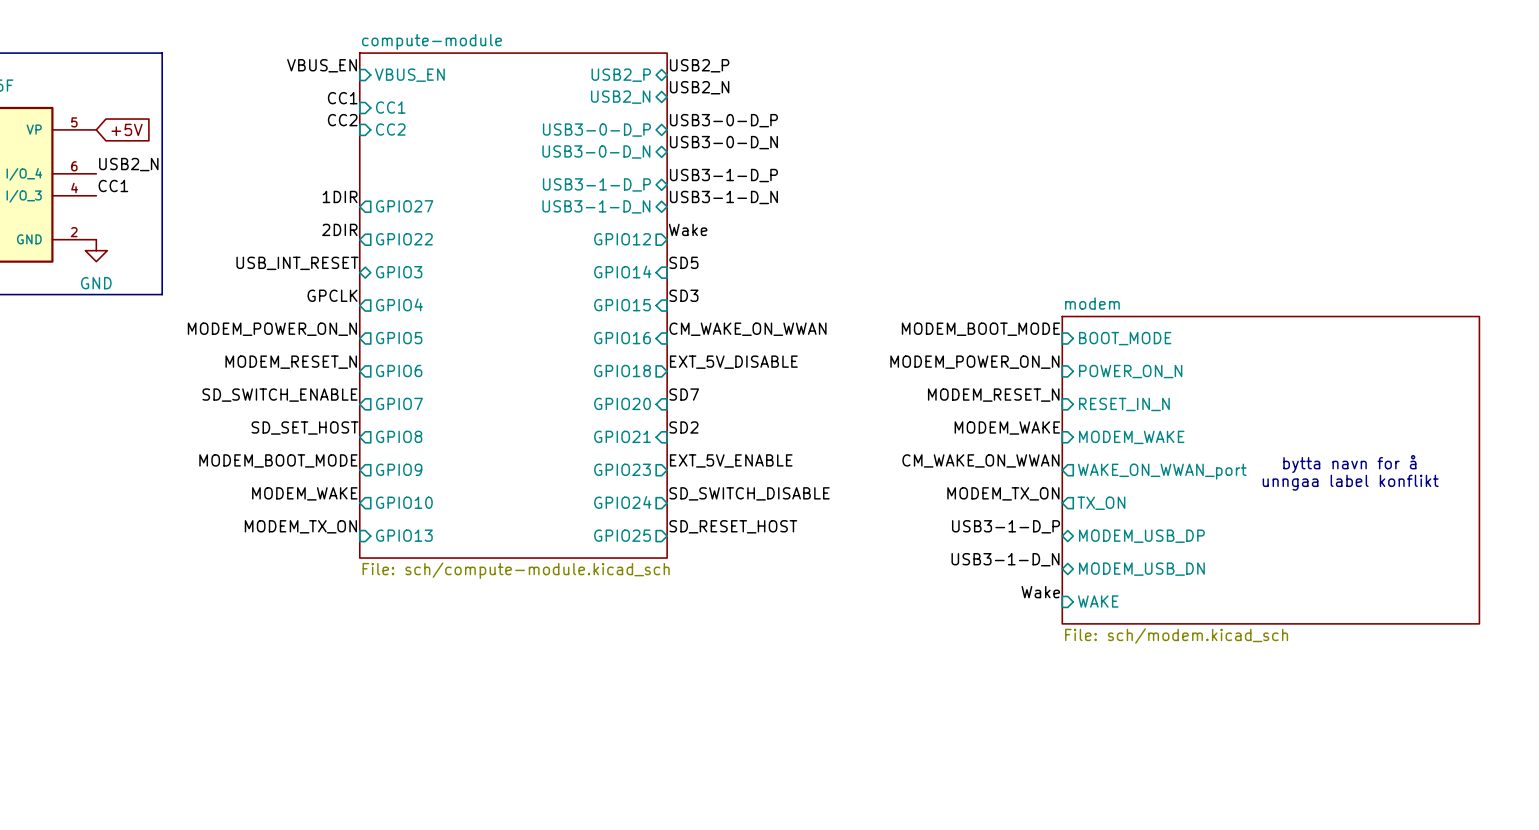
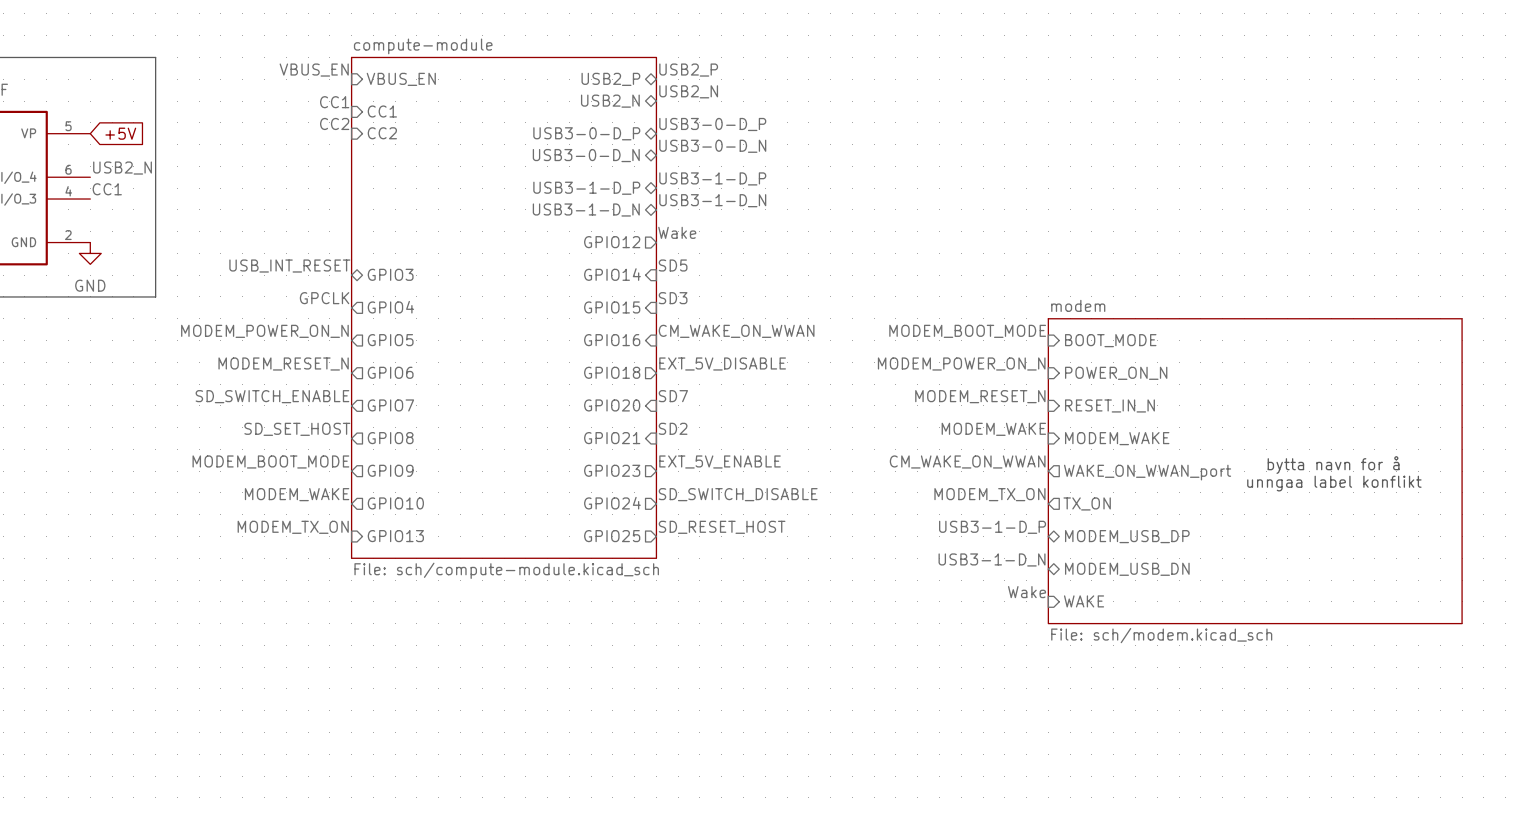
label: 1DIR (340, 196) -> none
sheet pin: GPIO27 (404, 206) -> none
label: 2DIR (339, 229) -> none
sheet pin: GPIO22 (404, 239) -> none

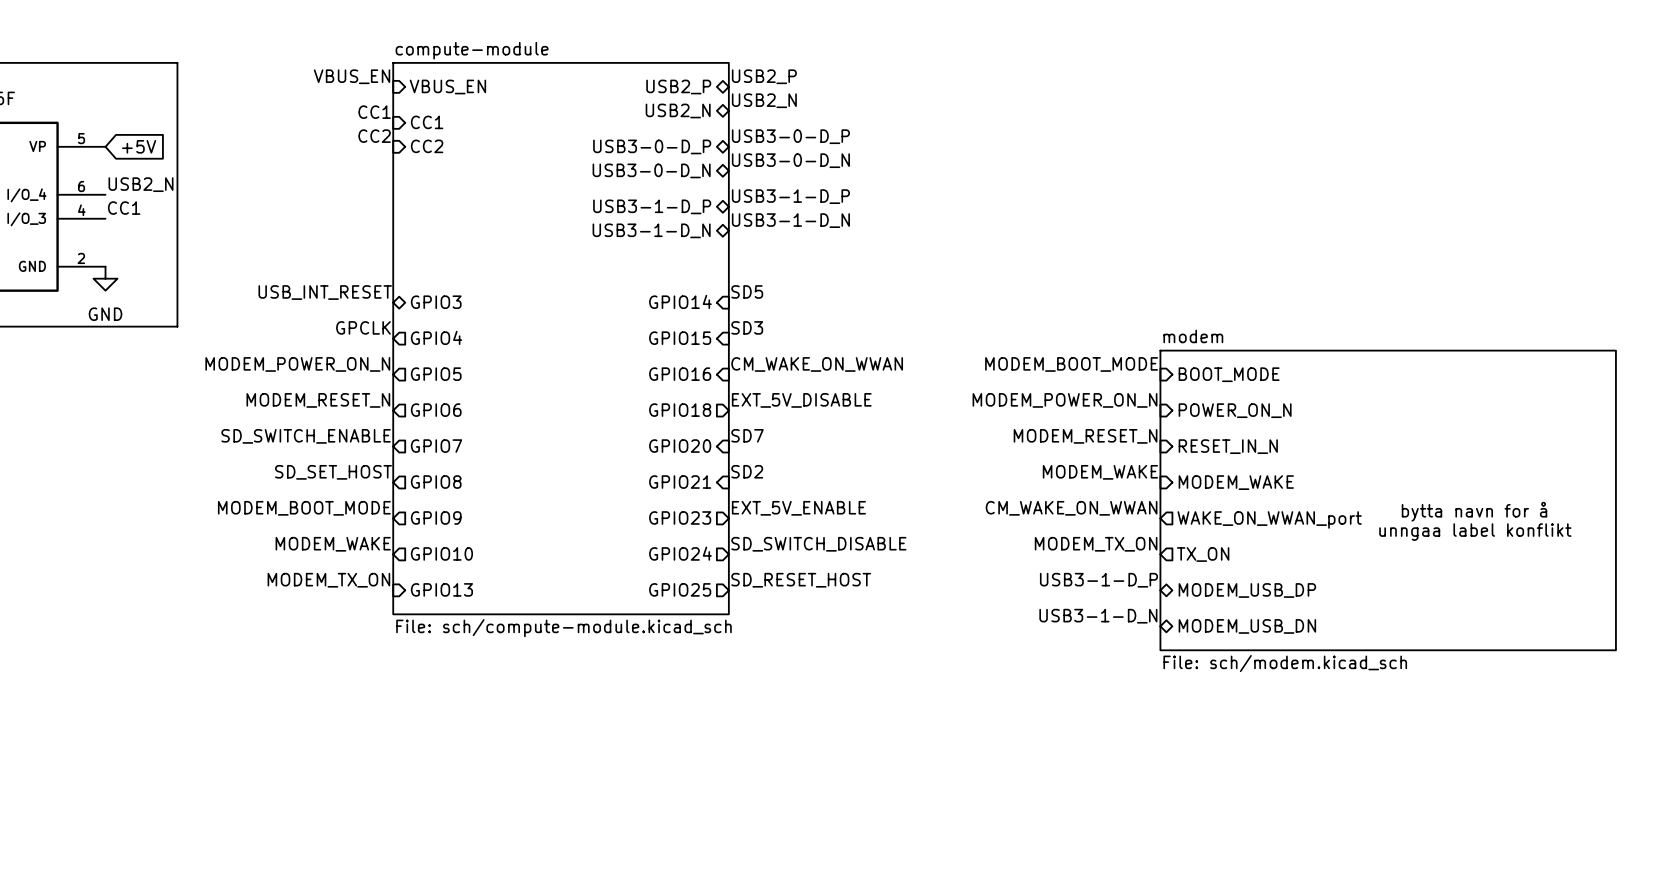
label: Wake (677, 232) -> none
sheet pin: GPIO12 (612, 242) -> none
sheet modem: none -> File: sch/modem.kicad_sch (1388, 500)
sheet modem: File: sch/modem.kicad_sch (1255, 471) -> none
label: Wake (1027, 592) -> none
sheet pin: WAKE (1084, 601) -> none

